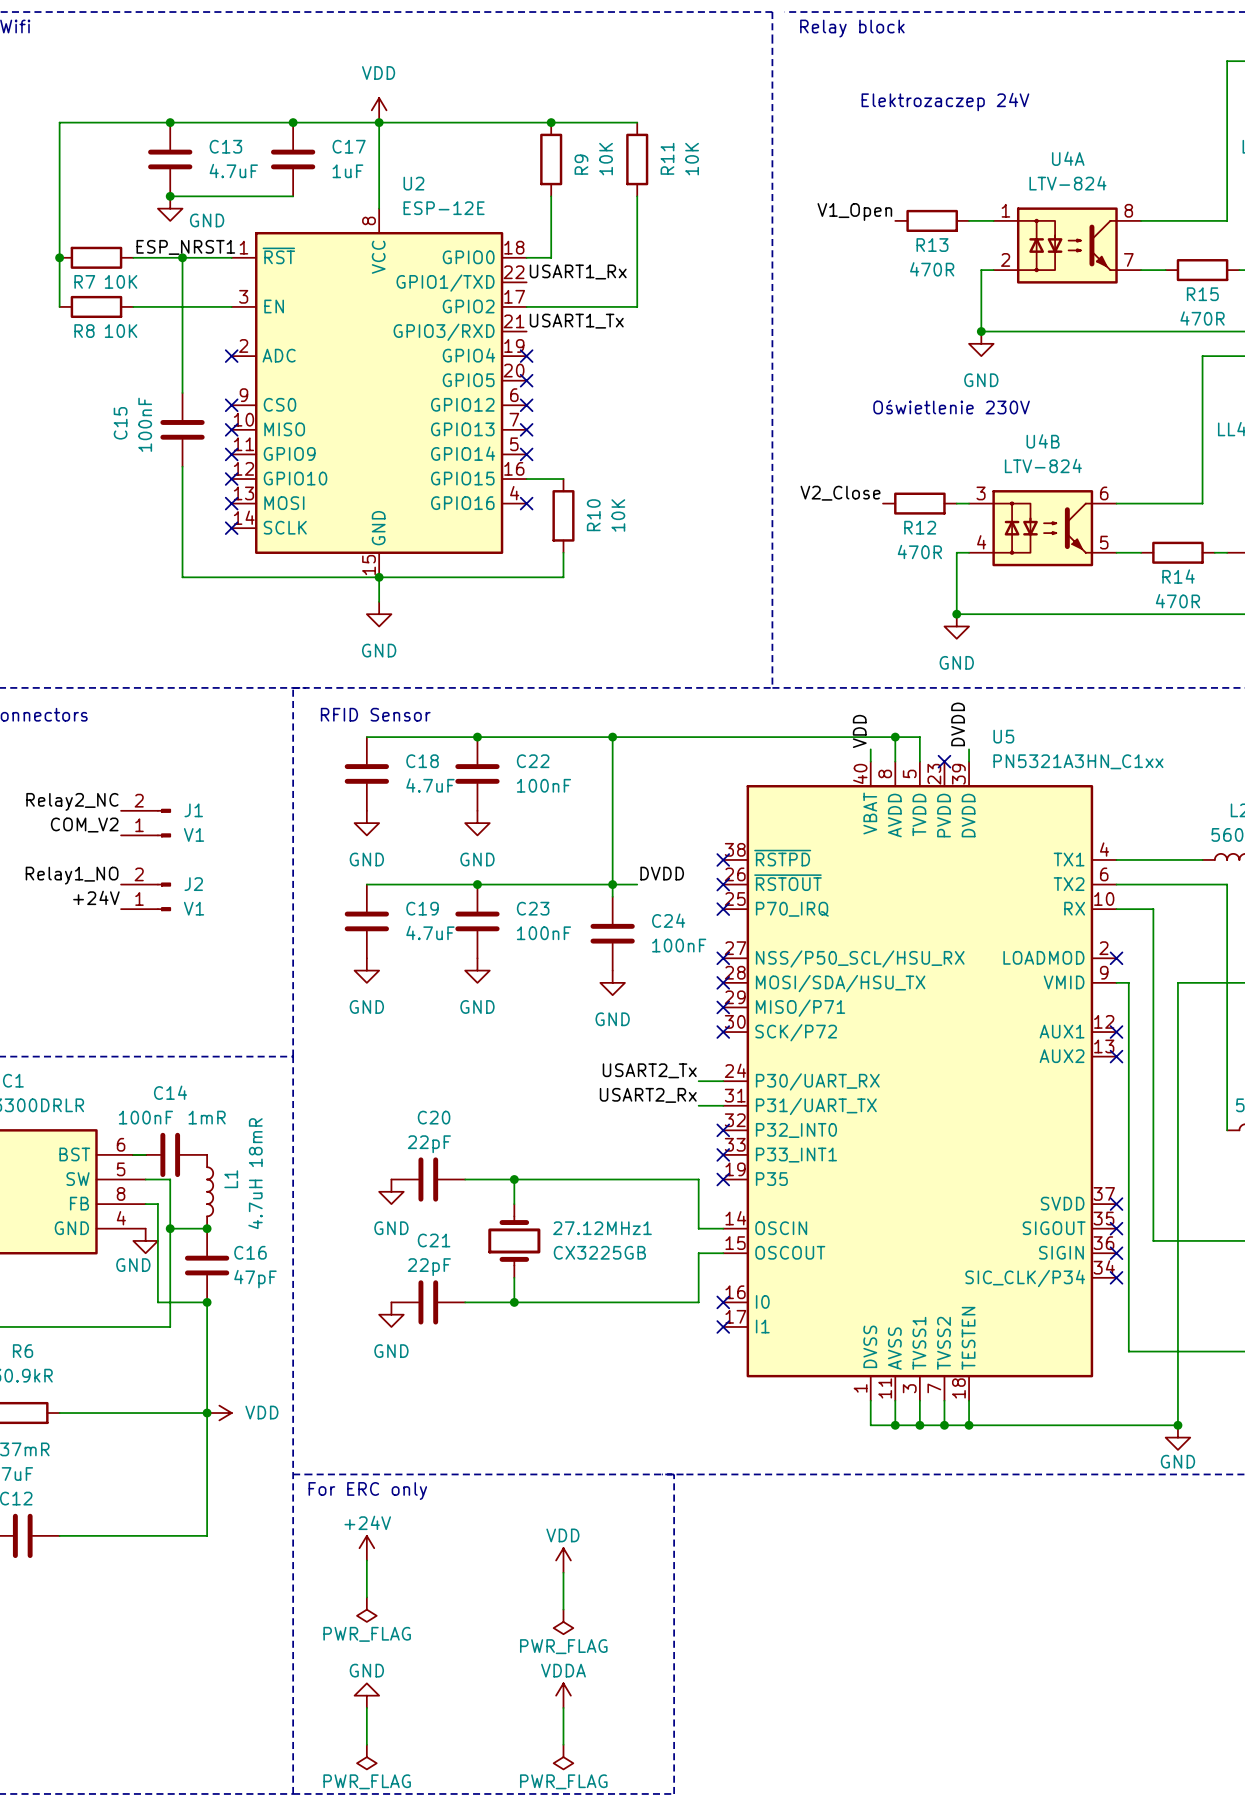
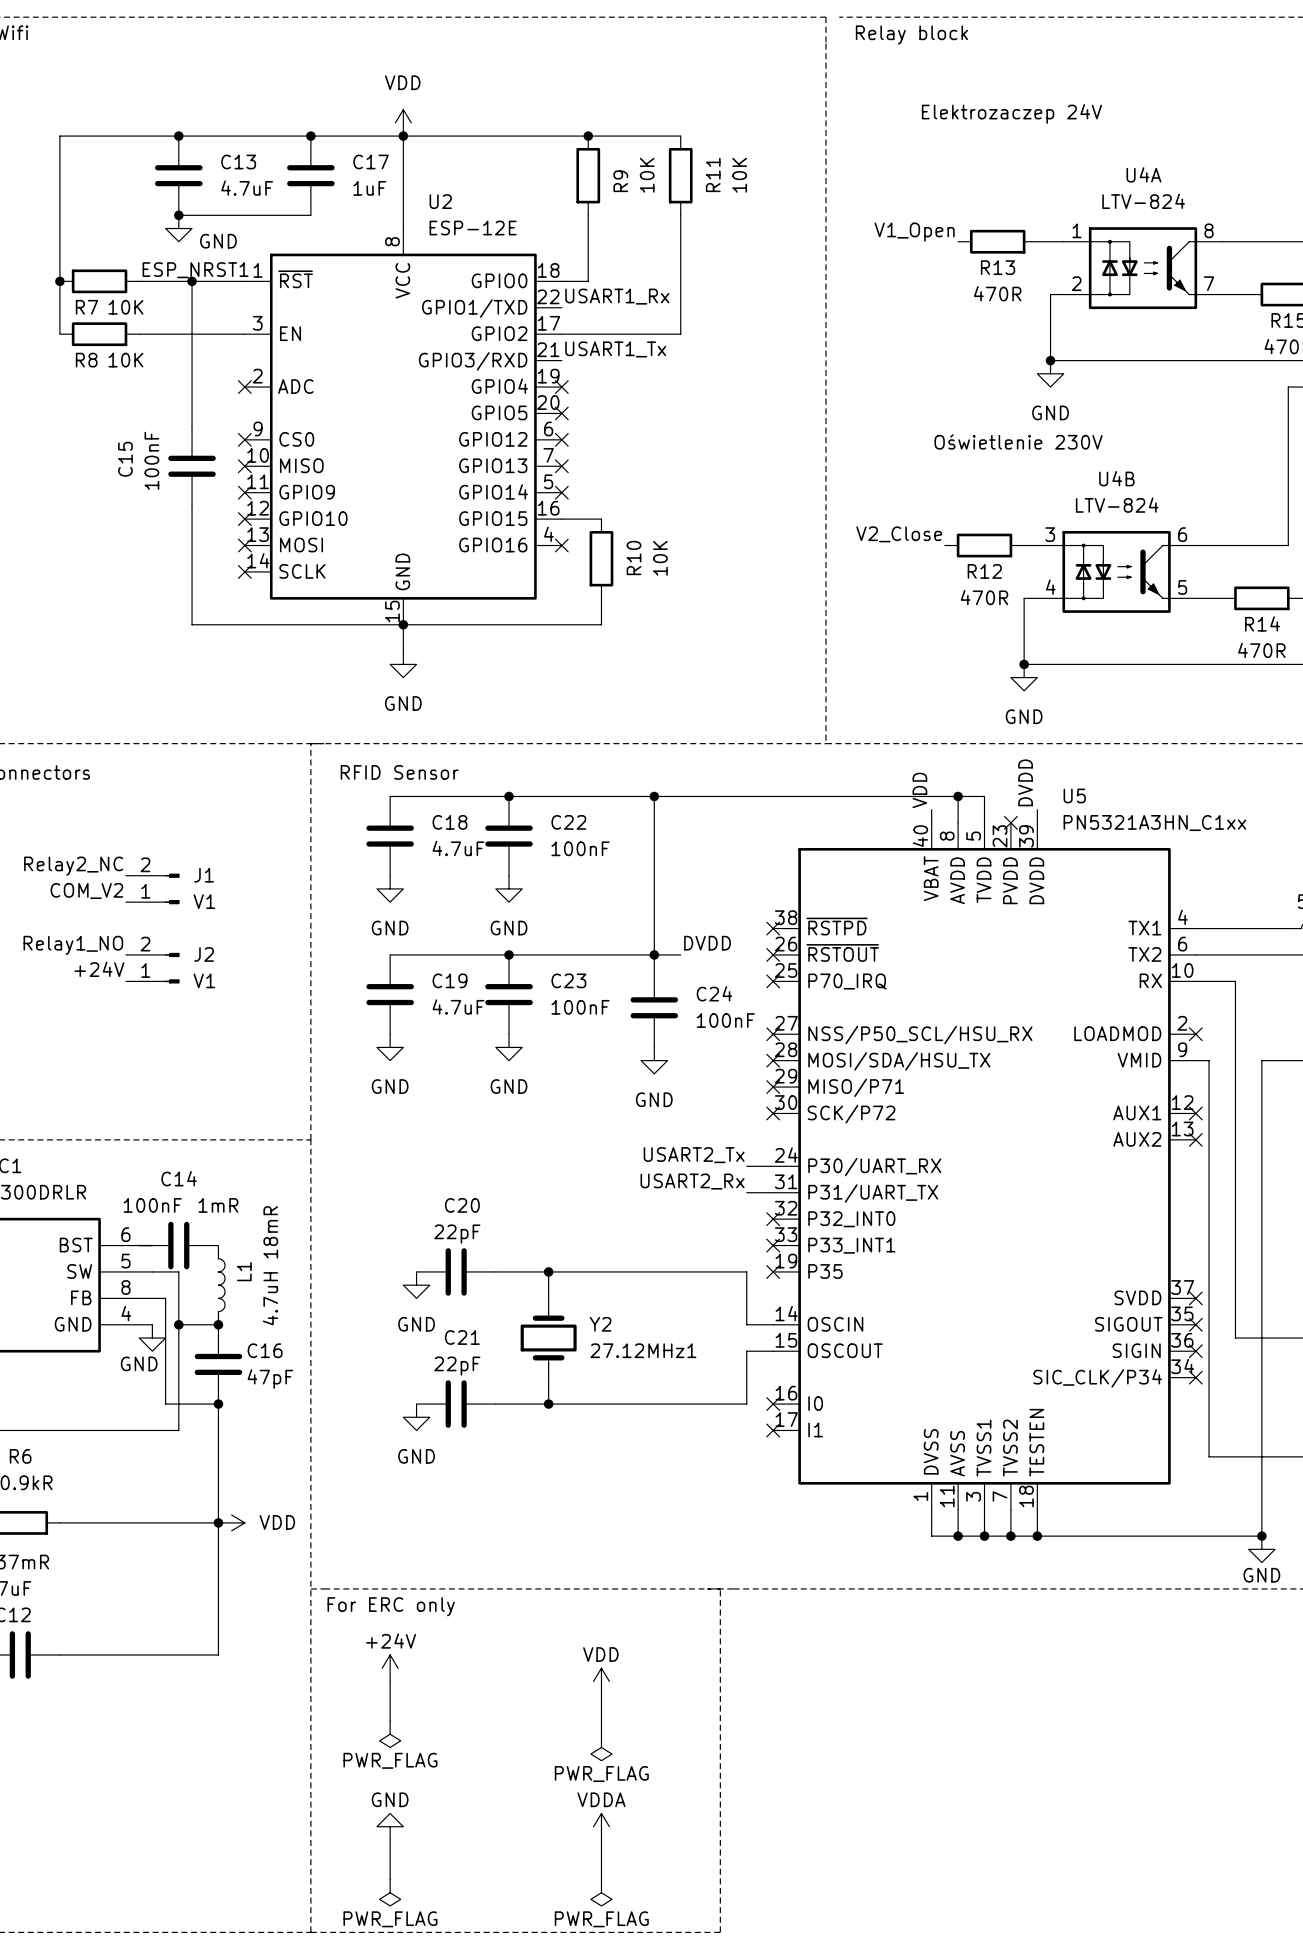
27.12MHz1 name: 27.12MHz1 (602, 1228) -> Y2 (600, 1324)
27.12MHz1 value: CX3225GB (599, 1252) -> 27.12MHz1 (643, 1350)

